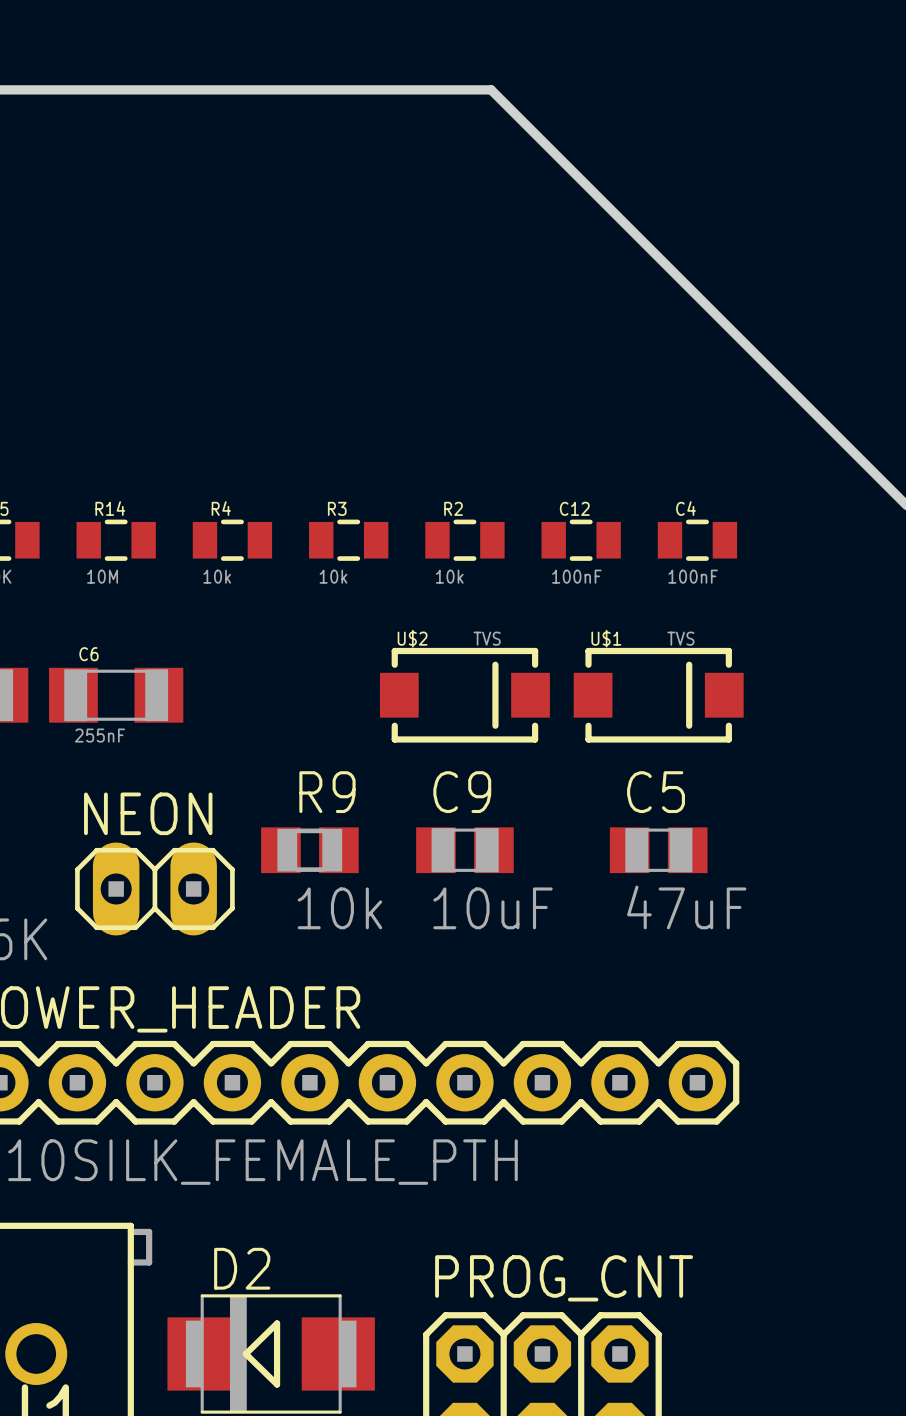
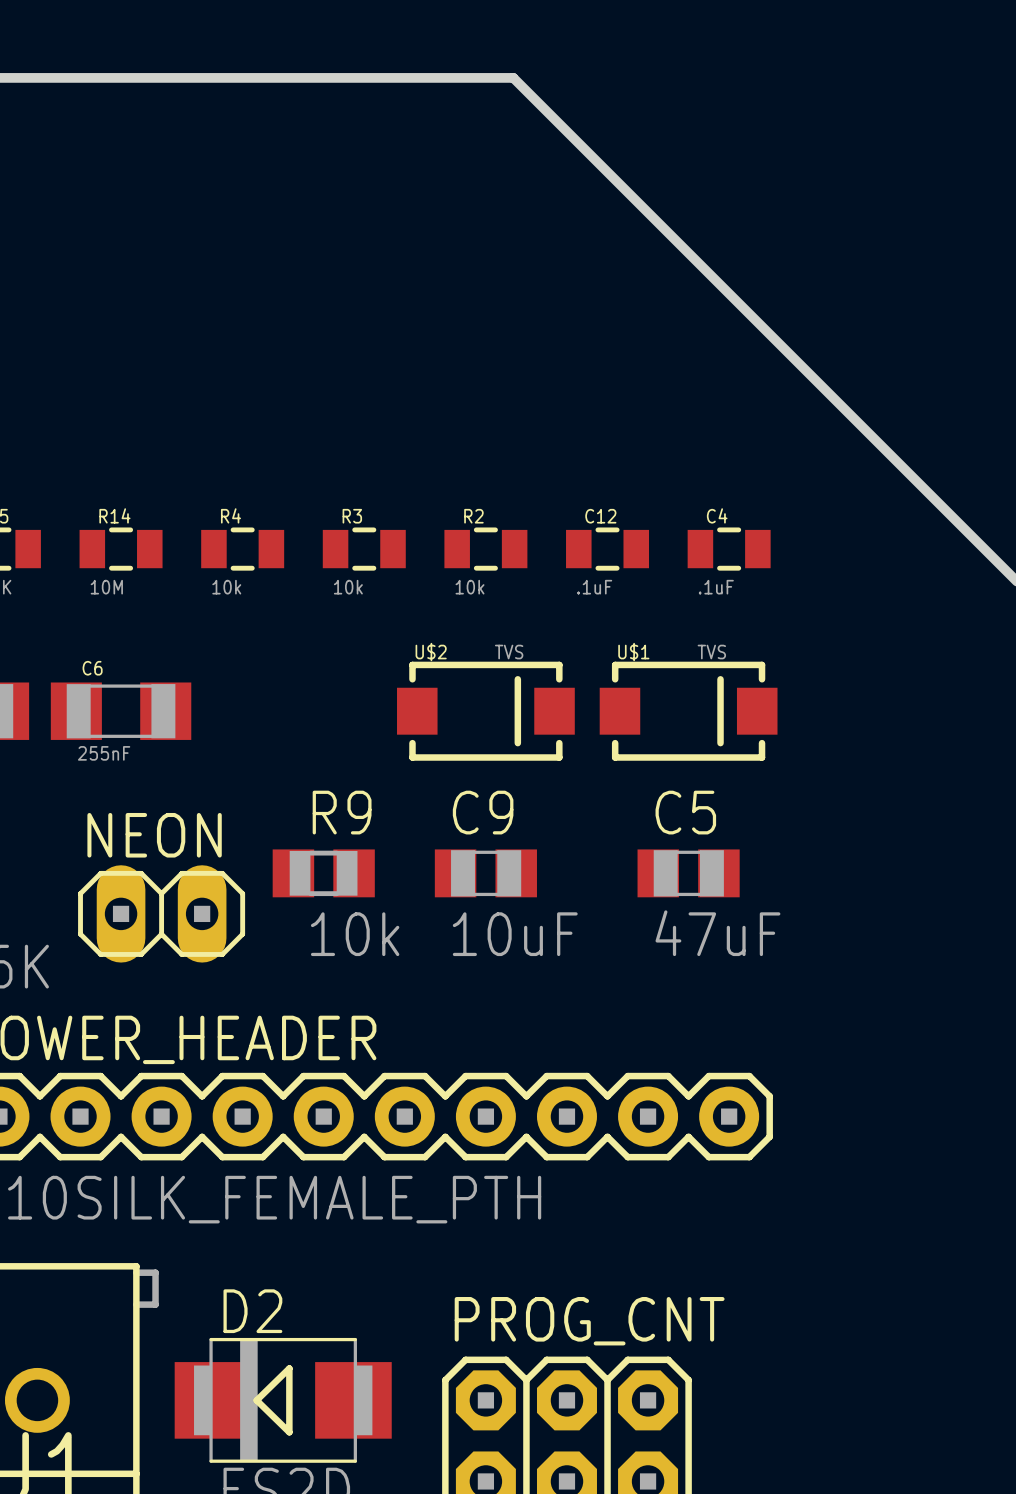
C12 value: 100nF (576, 576) -> .1uF (594, 587)
C4 value: 100nF (693, 576) -> .1uF (716, 587)

